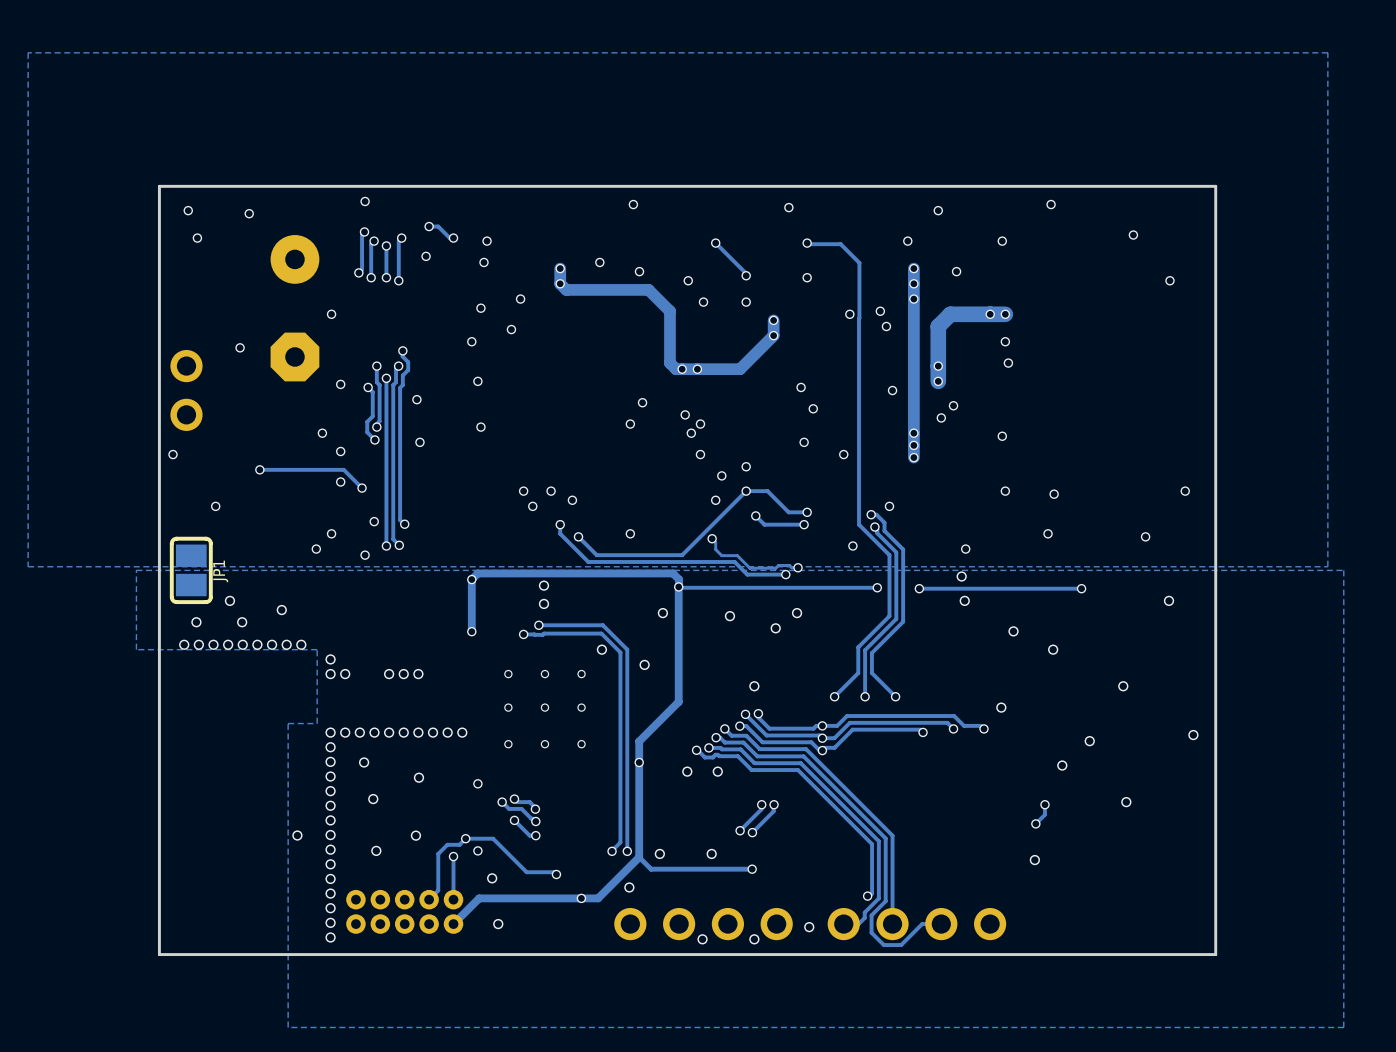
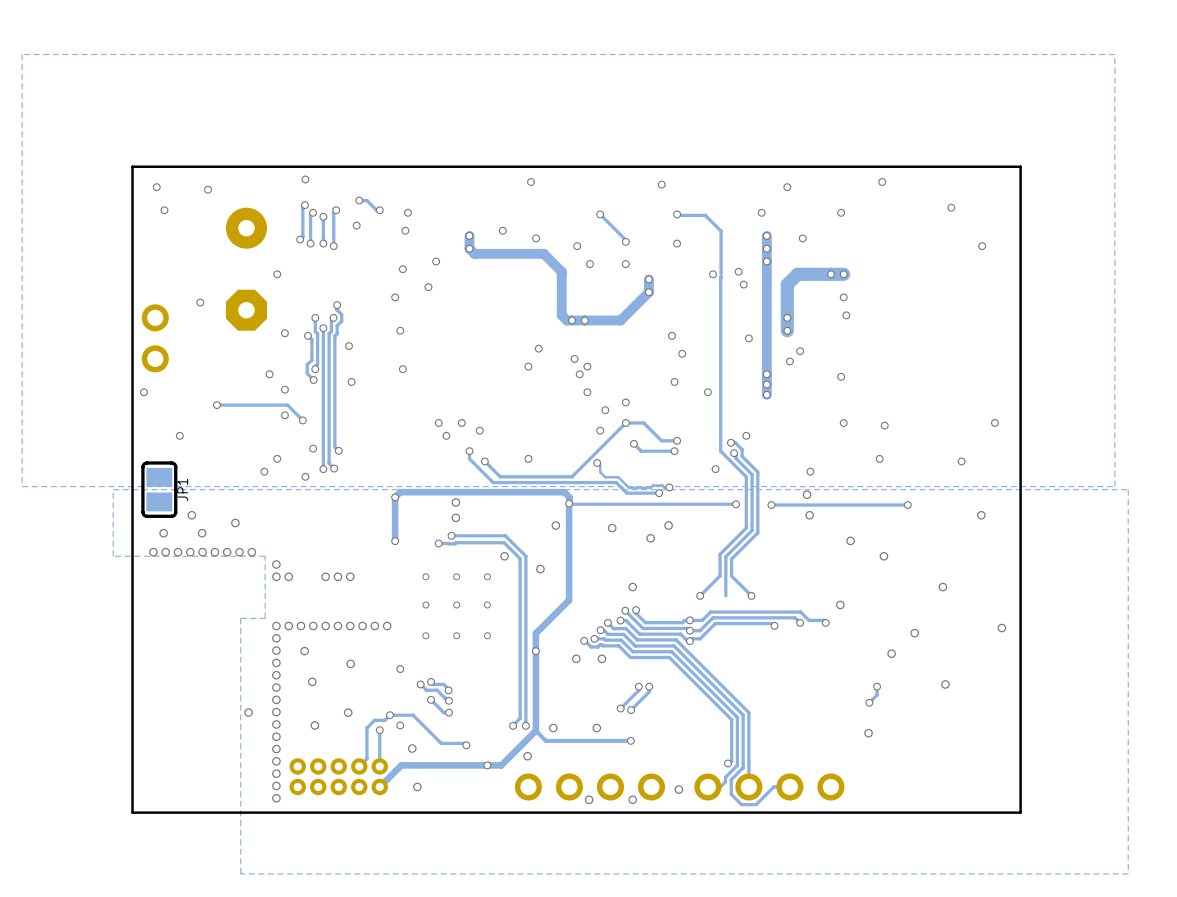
via: (865, 696) -> none

